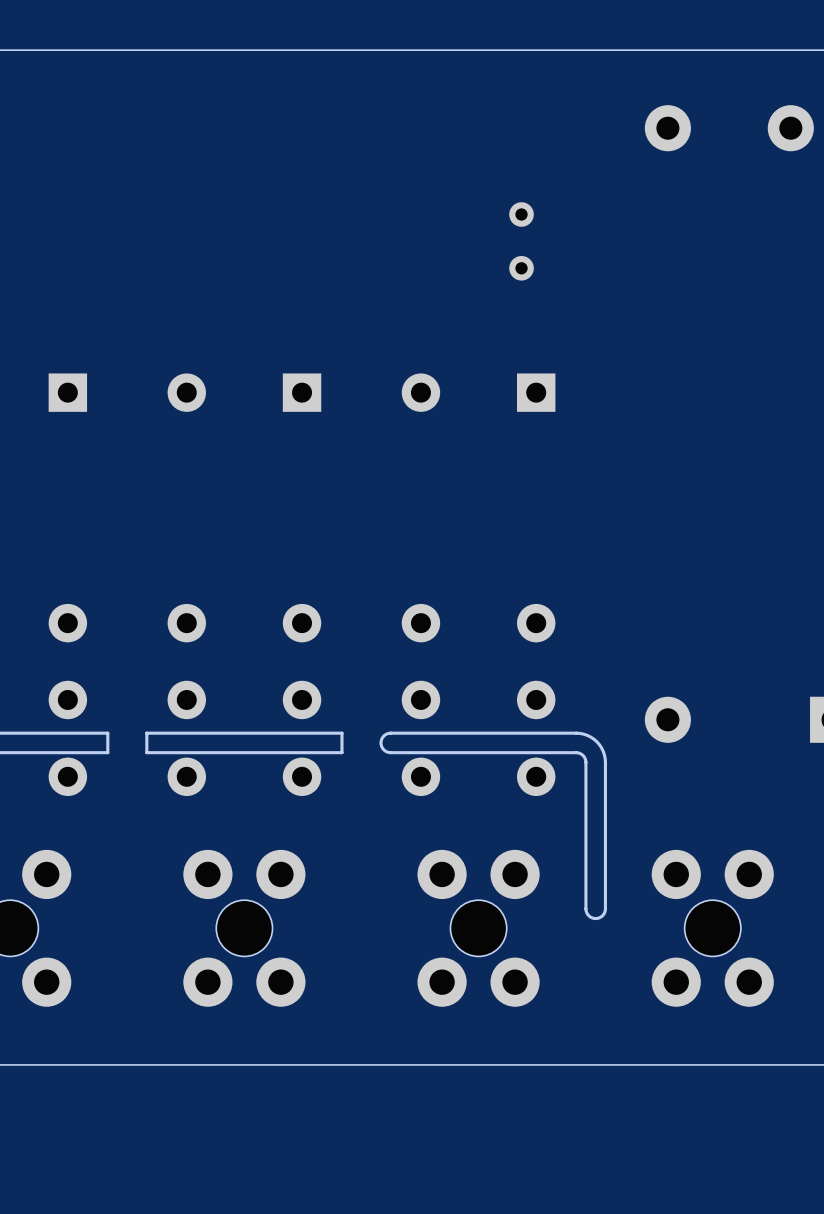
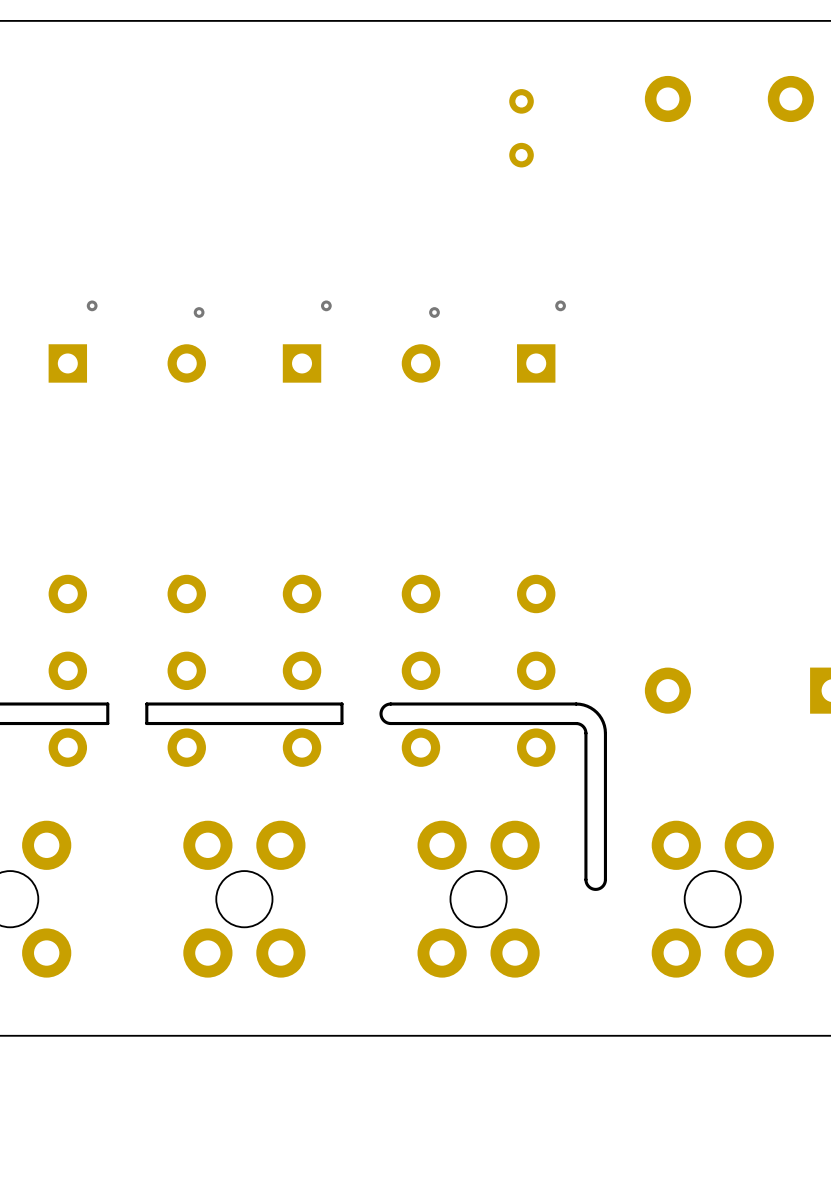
part position: (521, 241) -> (521, 128)
via: none -> (92, 305)
via: none -> (326, 305)
via: none -> (560, 305)
via: none -> (199, 312)
via: none -> (434, 312)

